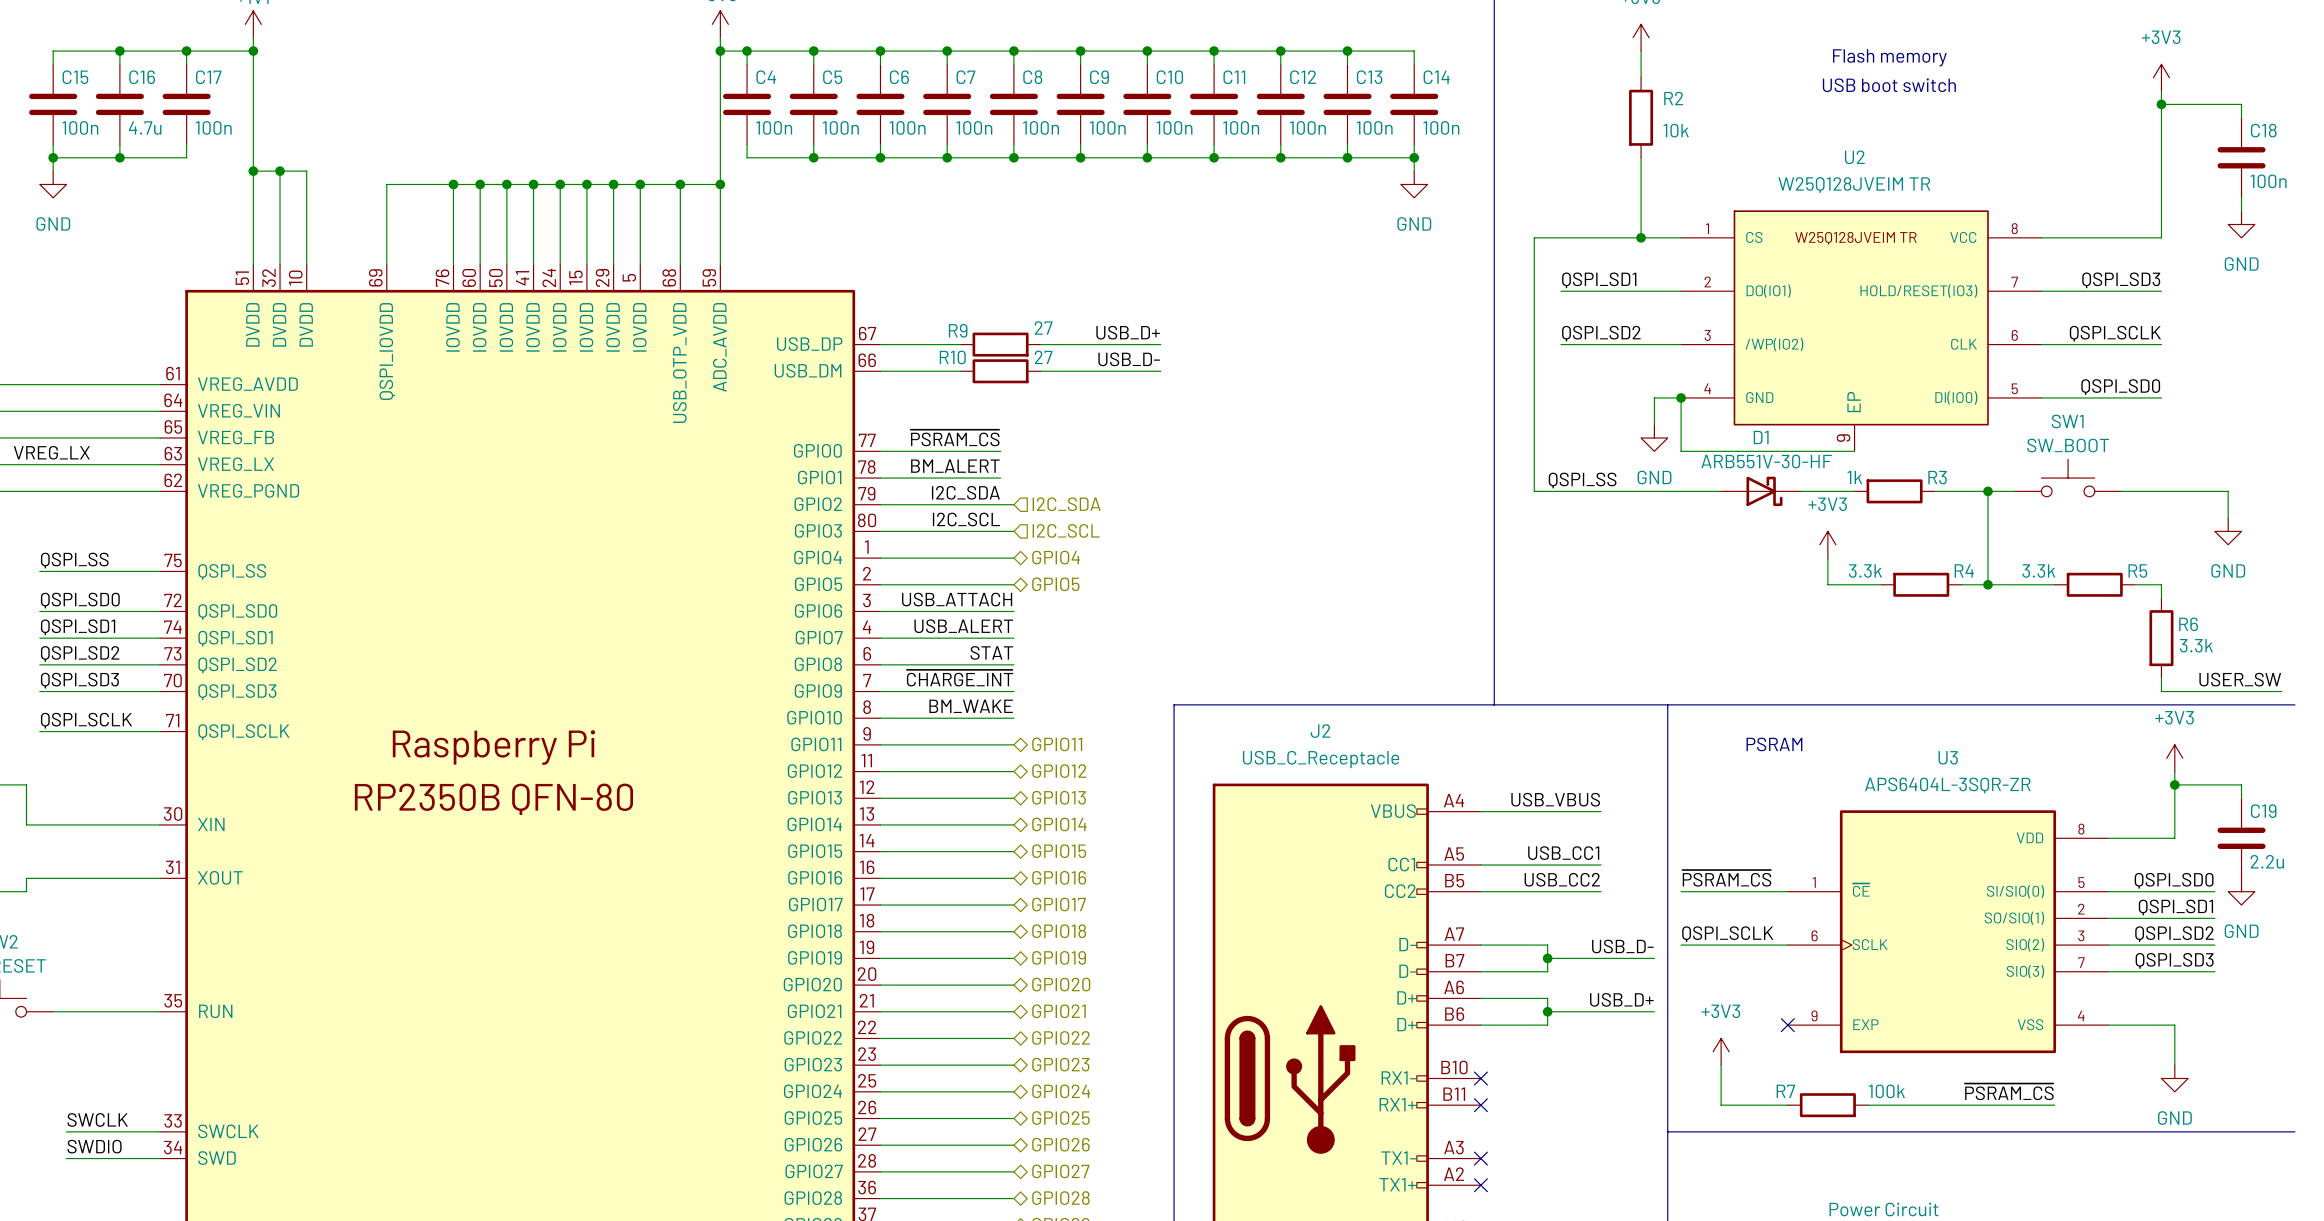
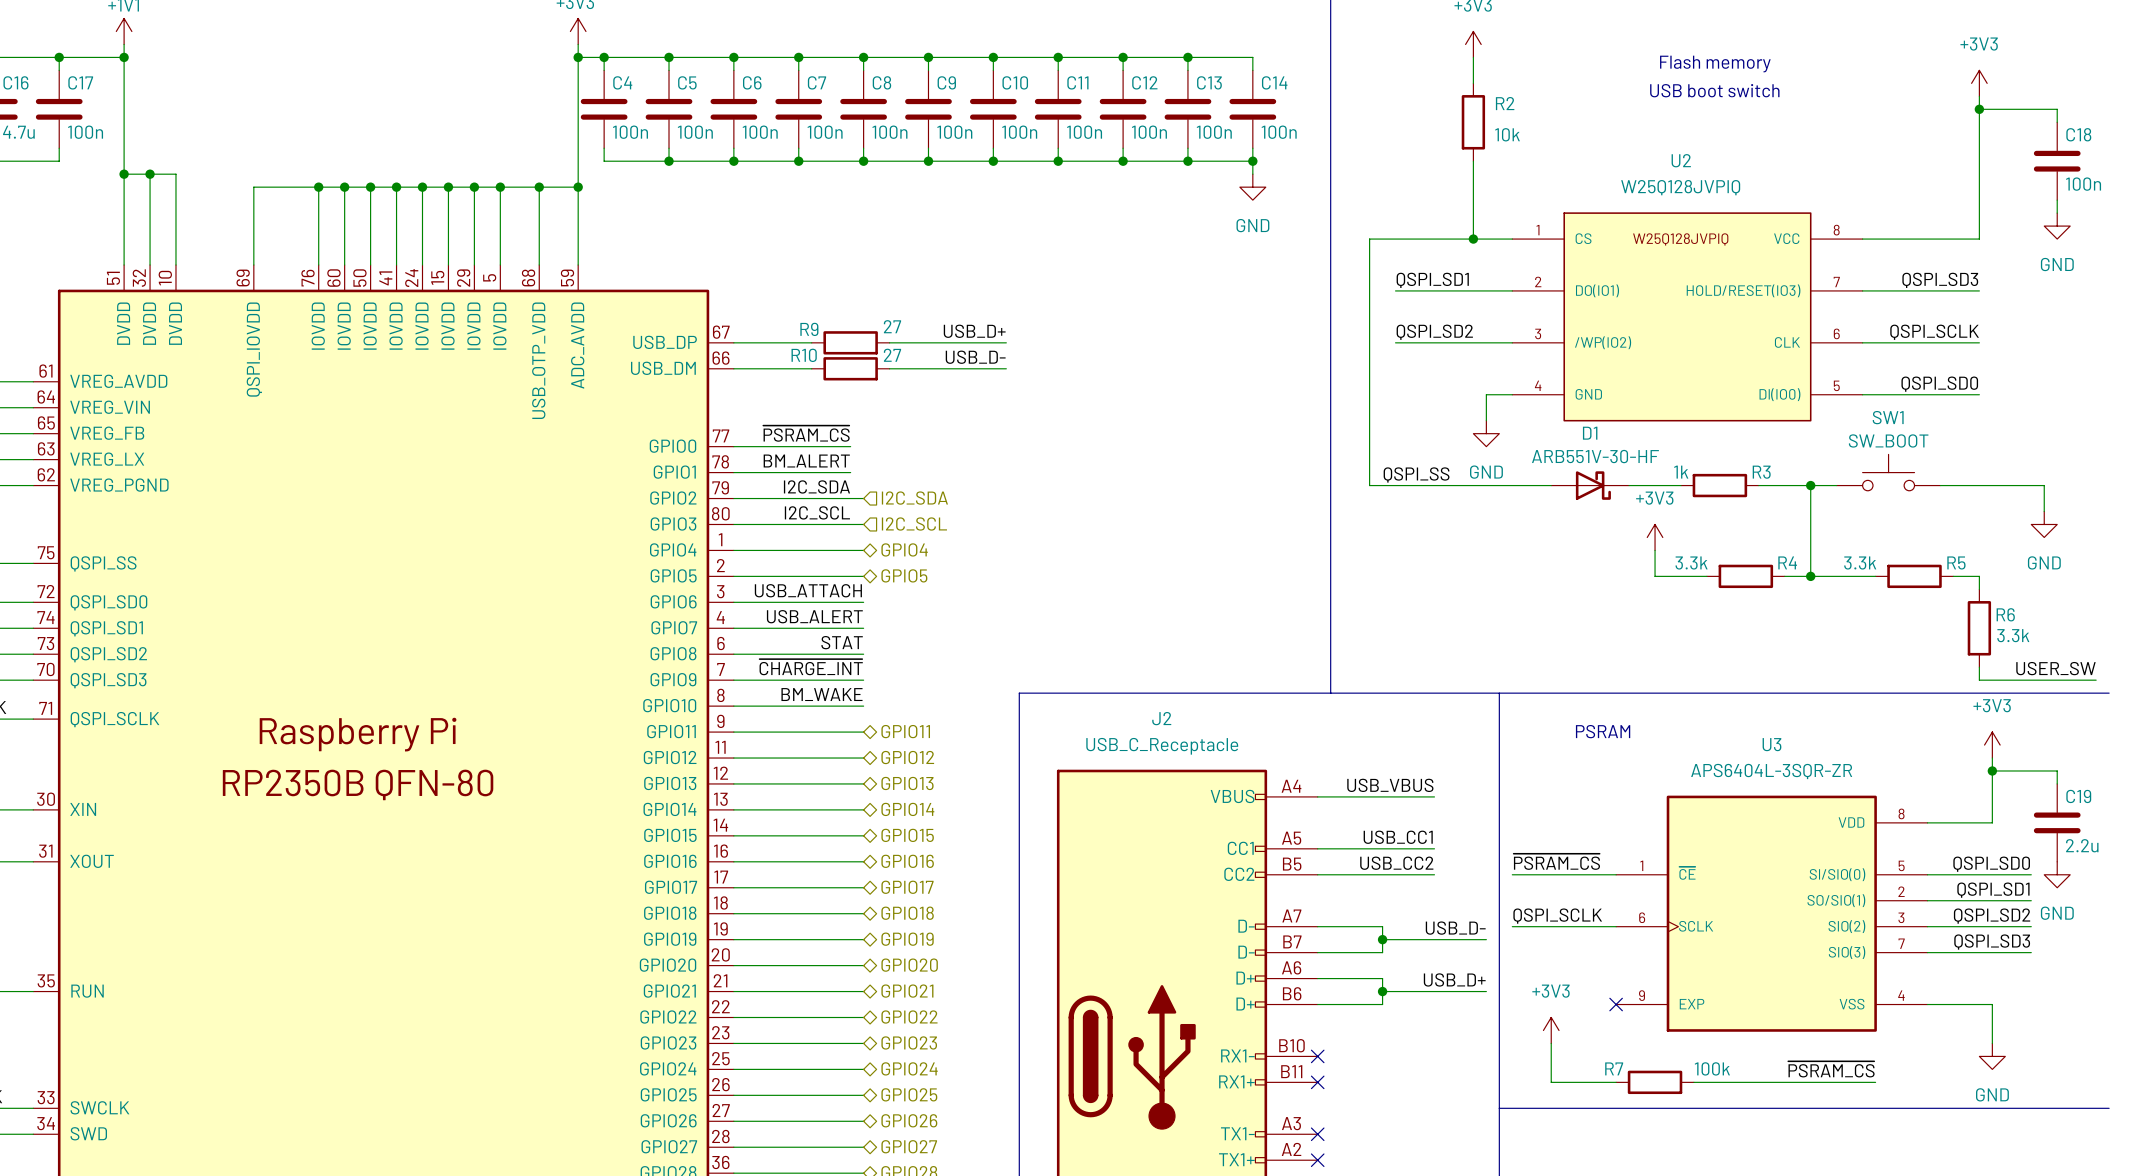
U2 value: W25Q128JVEIM TR (1854, 184) -> W25Q128JVPIQ (1680, 187)
U2 symbol: [1681, 210, 2042, 452] -> [1512, 212, 1863, 422]
wire: (1681, 397) (1681, 451) (1854, 451) -> none
junction: (1681, 397) -> none

